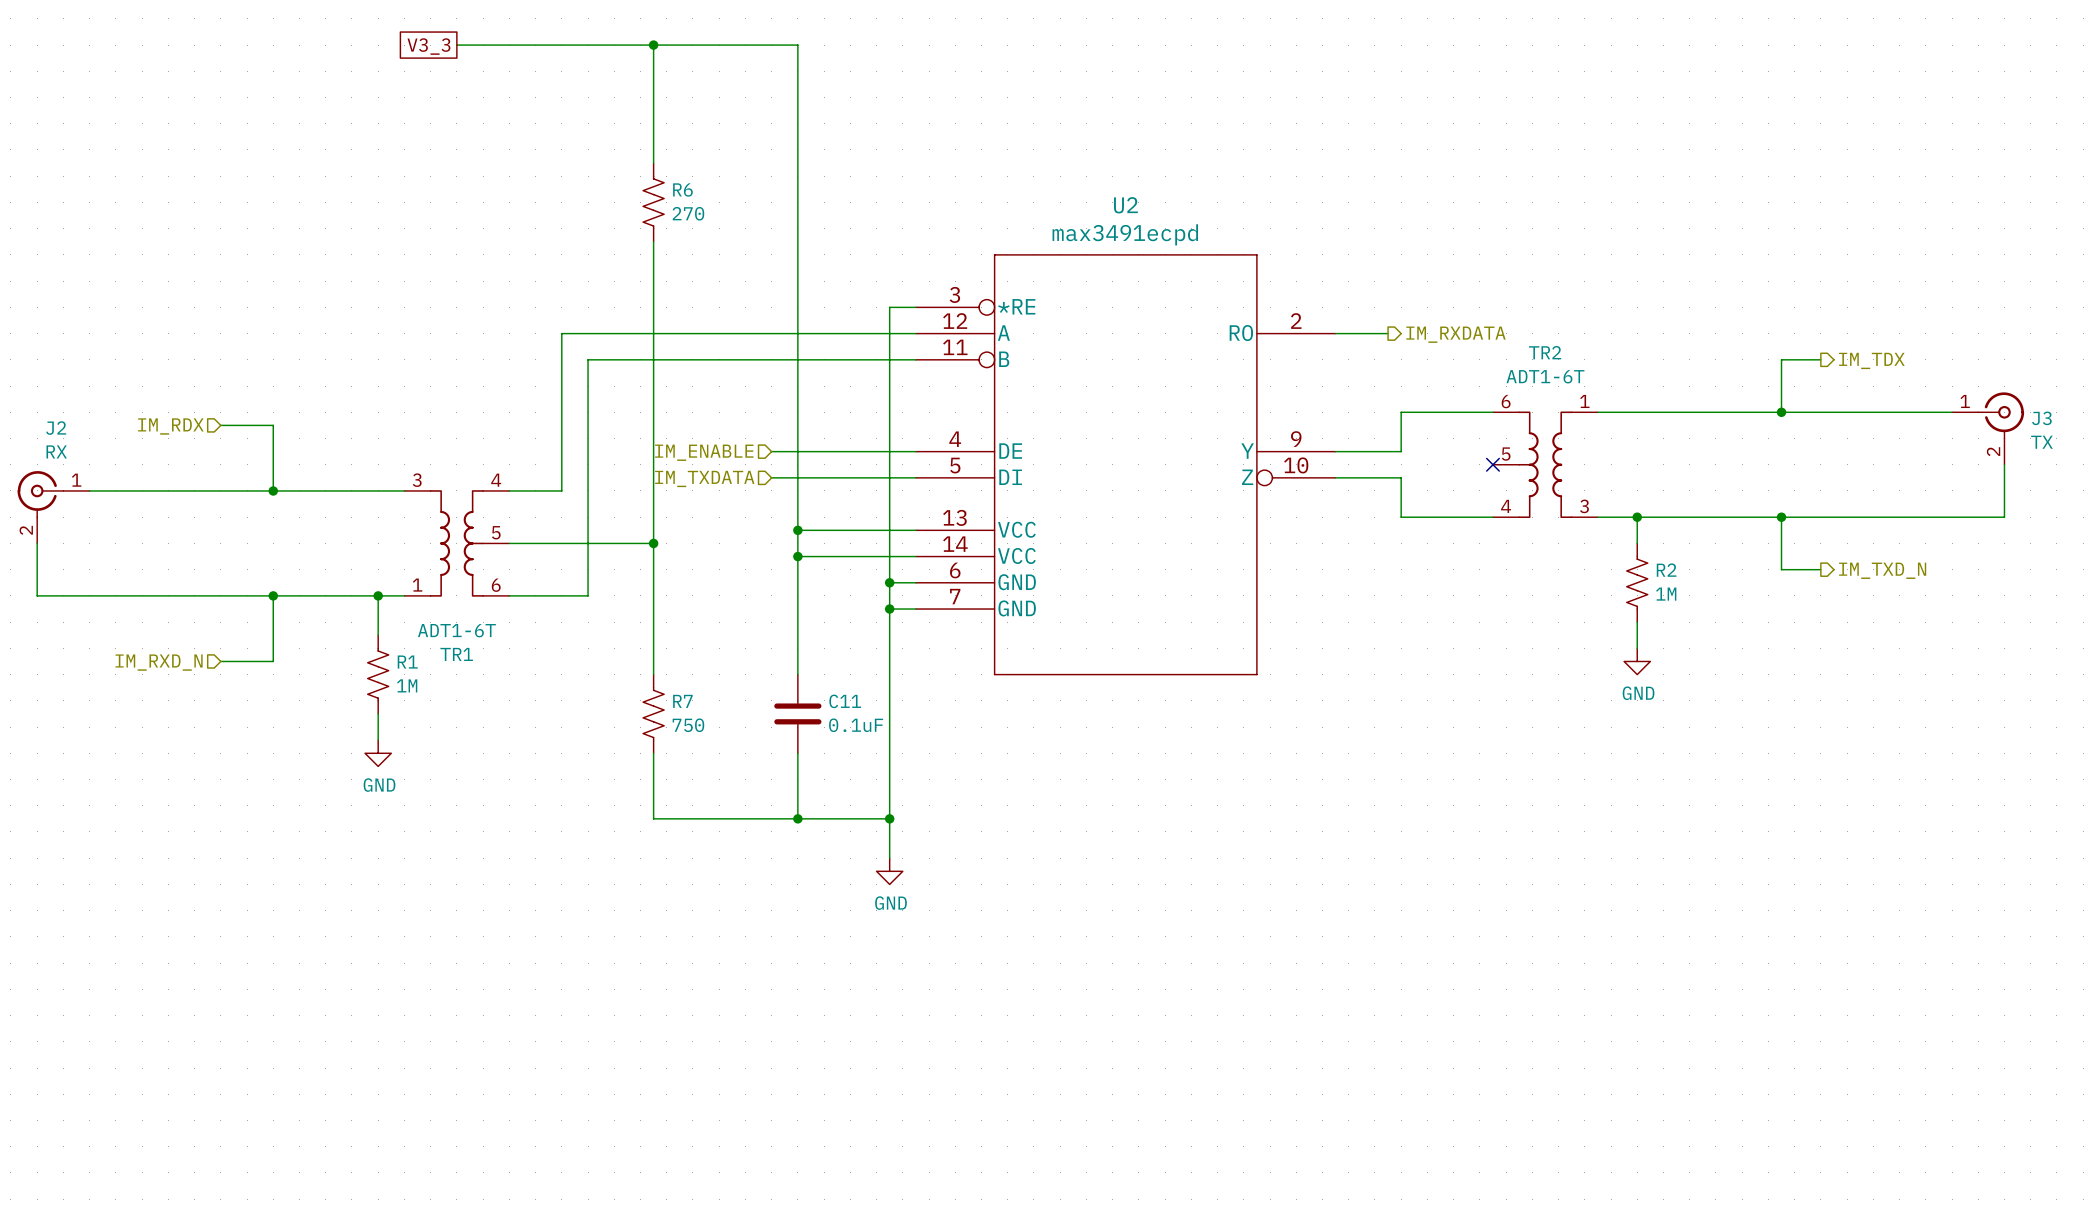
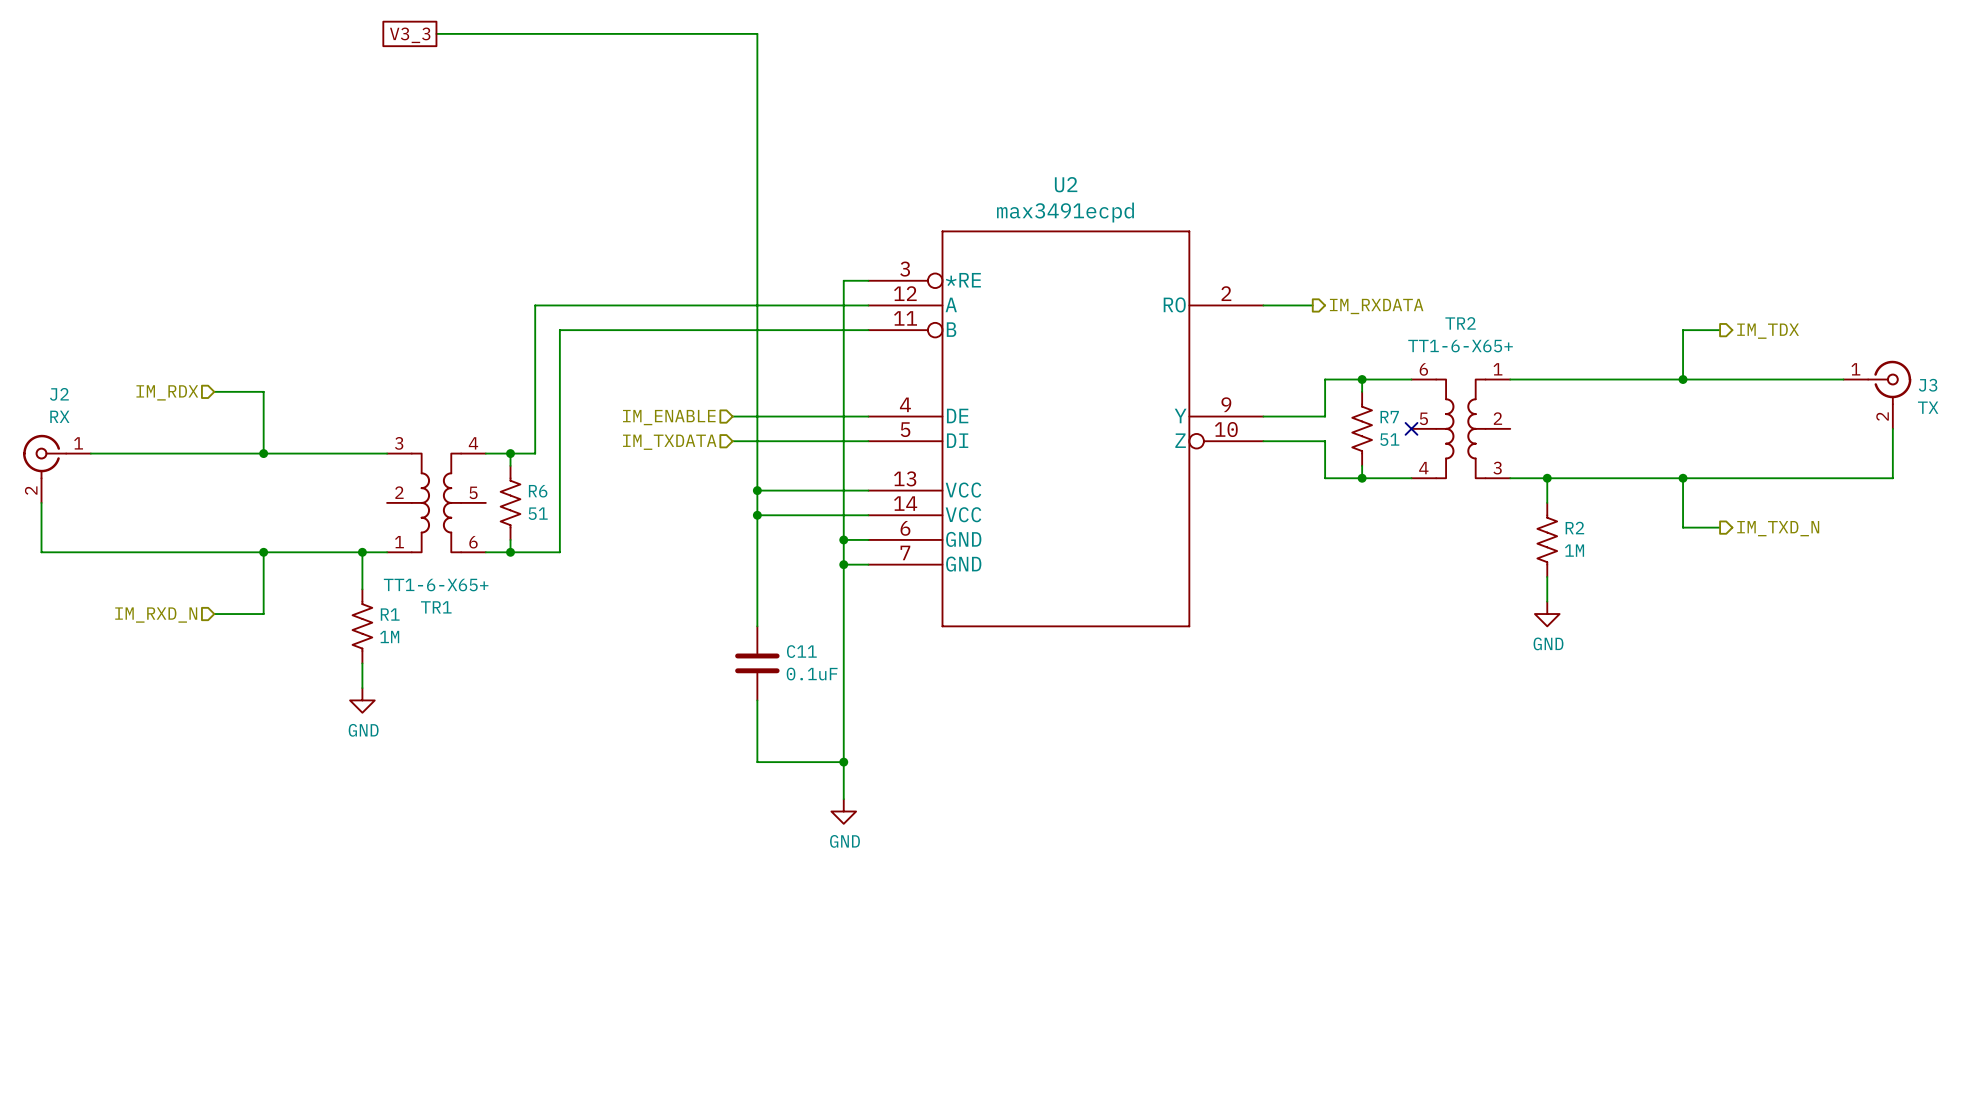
wire: (653, 45) (653, 163) -> none
junction: (653, 45) -> none
R6 position: (653, 202) -> (510, 502)
R6 value: 270 (688, 213) -> 51 (538, 513)
wire: (653, 241) (653, 674) -> none
TR2 value: ADT1-6T (1545, 376) -> TT1-6-X65+ (1460, 346)
TR2 symbol: [1492, 411, 1598, 519] -> [1411, 378, 1511, 479]
wire: none -> (1362, 379) (1362, 391)
junction: none -> (1362, 379)
TR1 symbol: [404, 490, 510, 597] -> [387, 452, 486, 554]
wire: none -> (510, 453) (510, 465)
junction: none -> (510, 453)
wire: none -> (1362, 465) (1362, 478)
junction: none -> (1362, 478)
wire: (509, 543) (653, 543) -> none
junction: (653, 543) -> none
wire: none -> (510, 539) (510, 552)
junction: none -> (510, 552)
TR1 value: ADT1-6T (456, 630) -> TT1-6-X65+ (436, 585)
R7 position: (653, 713) -> (1362, 428)
R7 value: 750 (688, 725) -> 51 (1389, 439)
wire: (653, 753) (653, 818) (797, 818) -> none
junction: (797, 818) -> none

